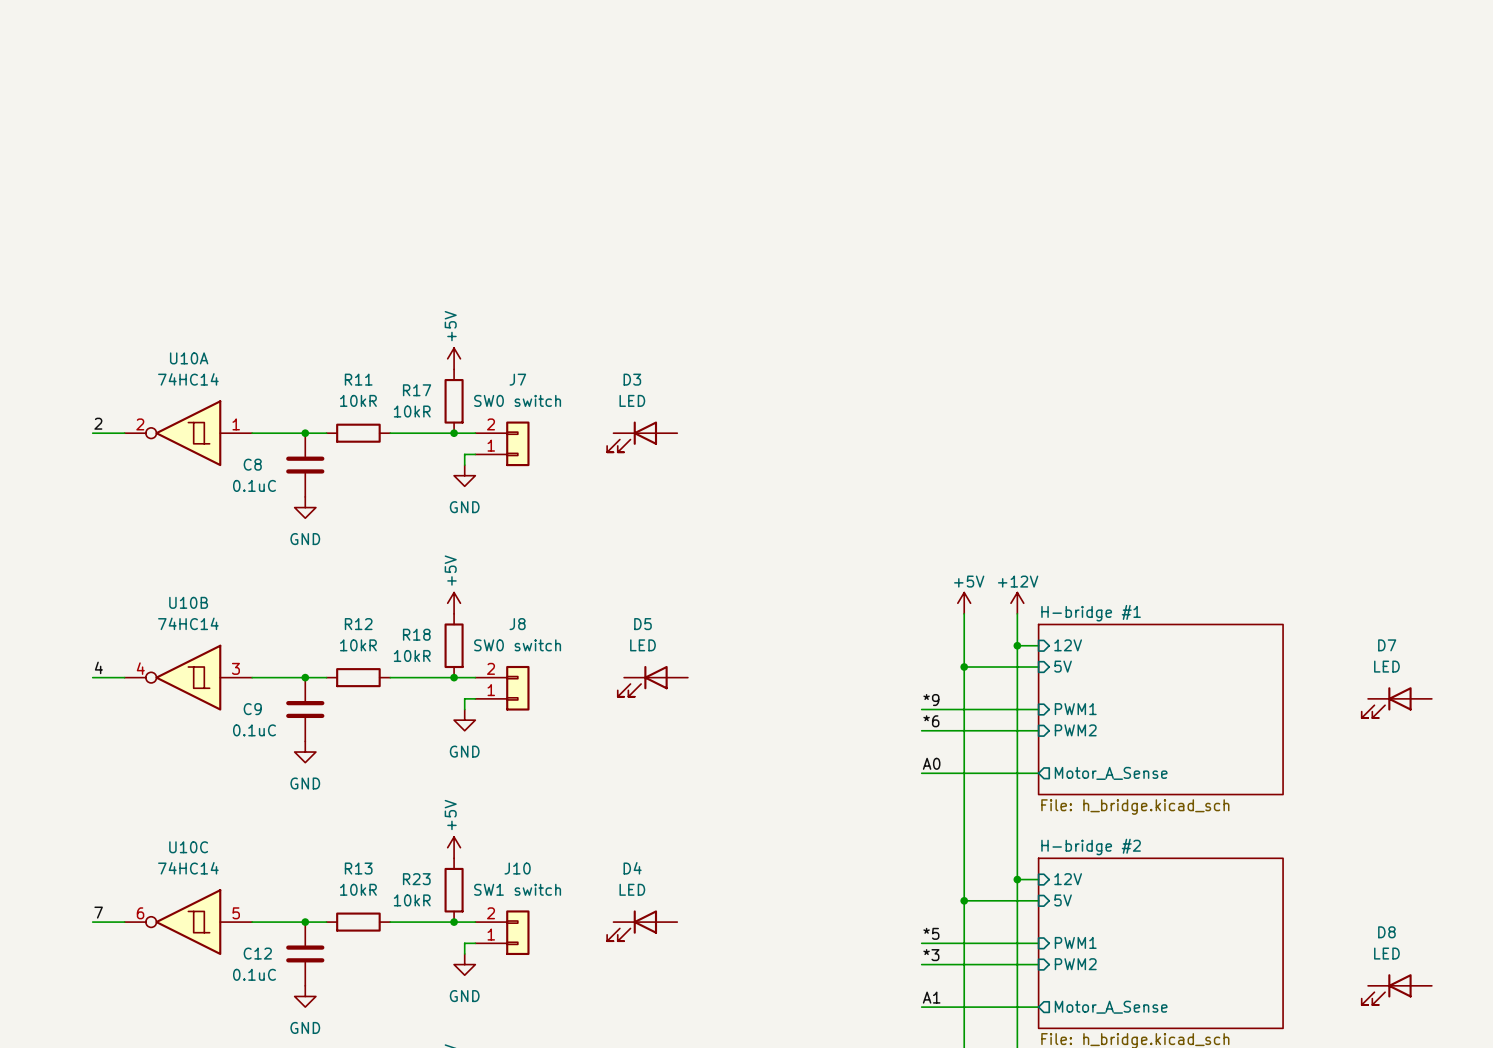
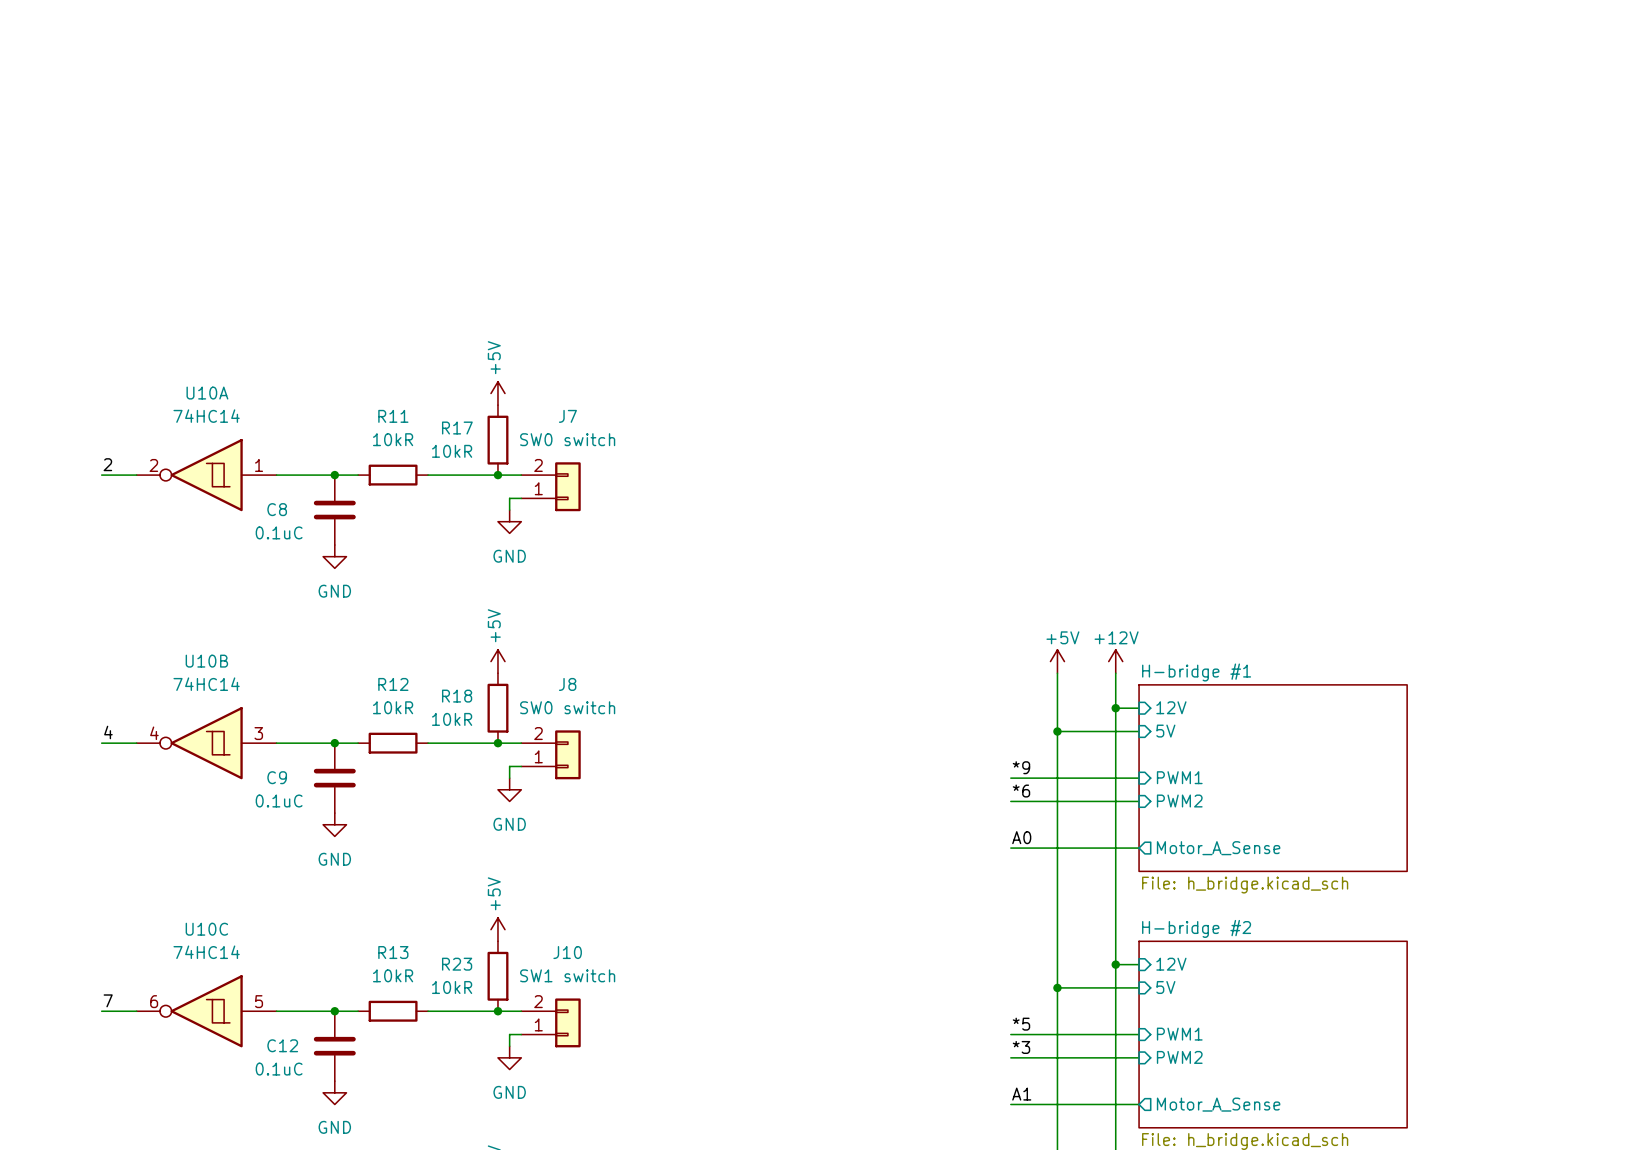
D3: LED (642, 436) -> none
D5: LED (652, 681) -> none
D7: LED (1396, 702) -> none
D4: LED (642, 925) -> none
D8: LED (1396, 989) -> none

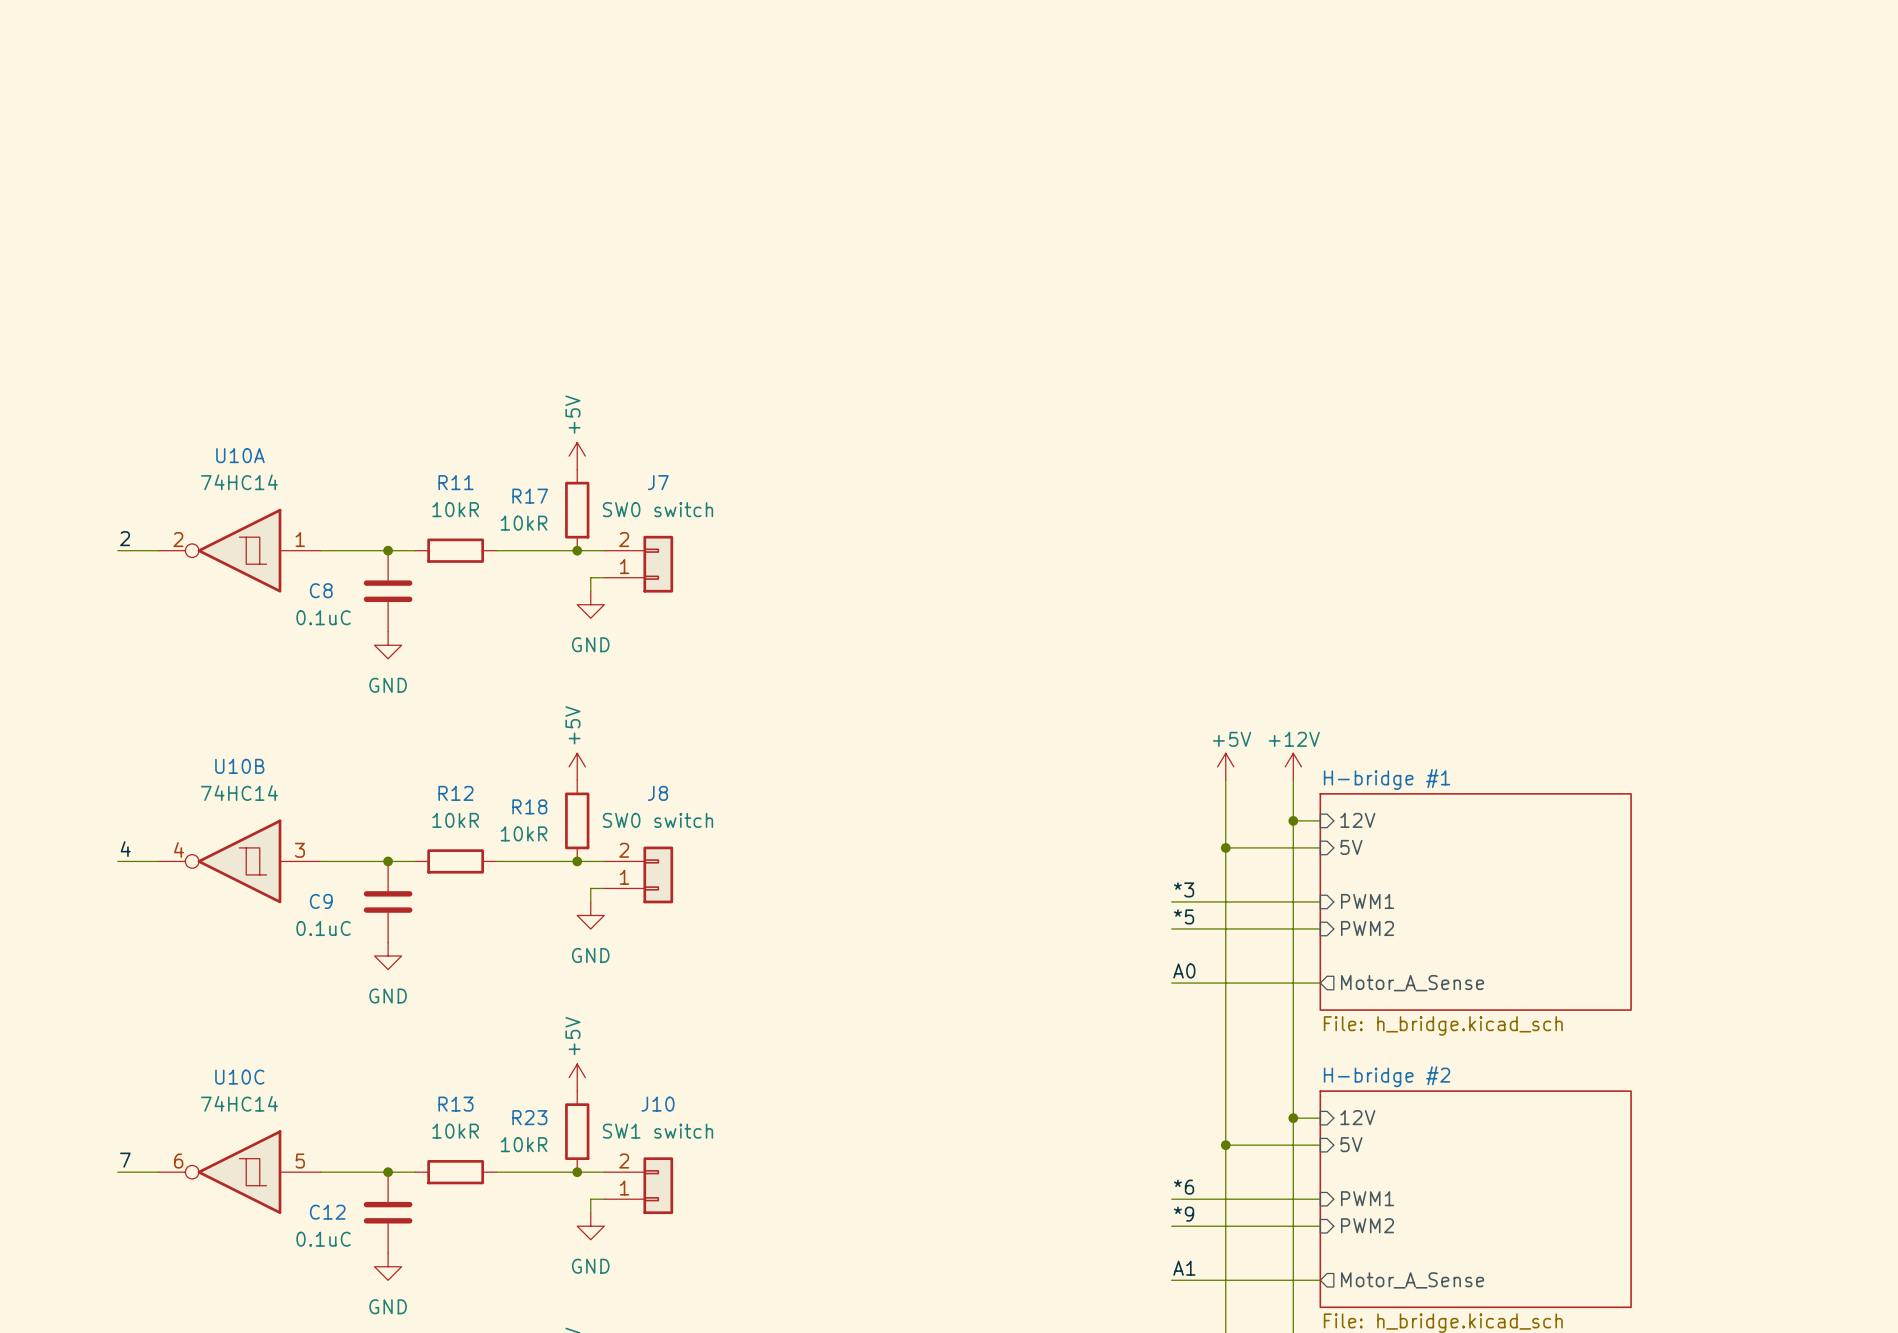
label: *9 (1021, 767) -> *3 (1184, 889)
label: *6 (1021, 791) -> *5 (1184, 916)
label: *5 (1021, 1024) -> *6 (1184, 1187)
label: *3 (1021, 1047) -> *9 (1184, 1214)

